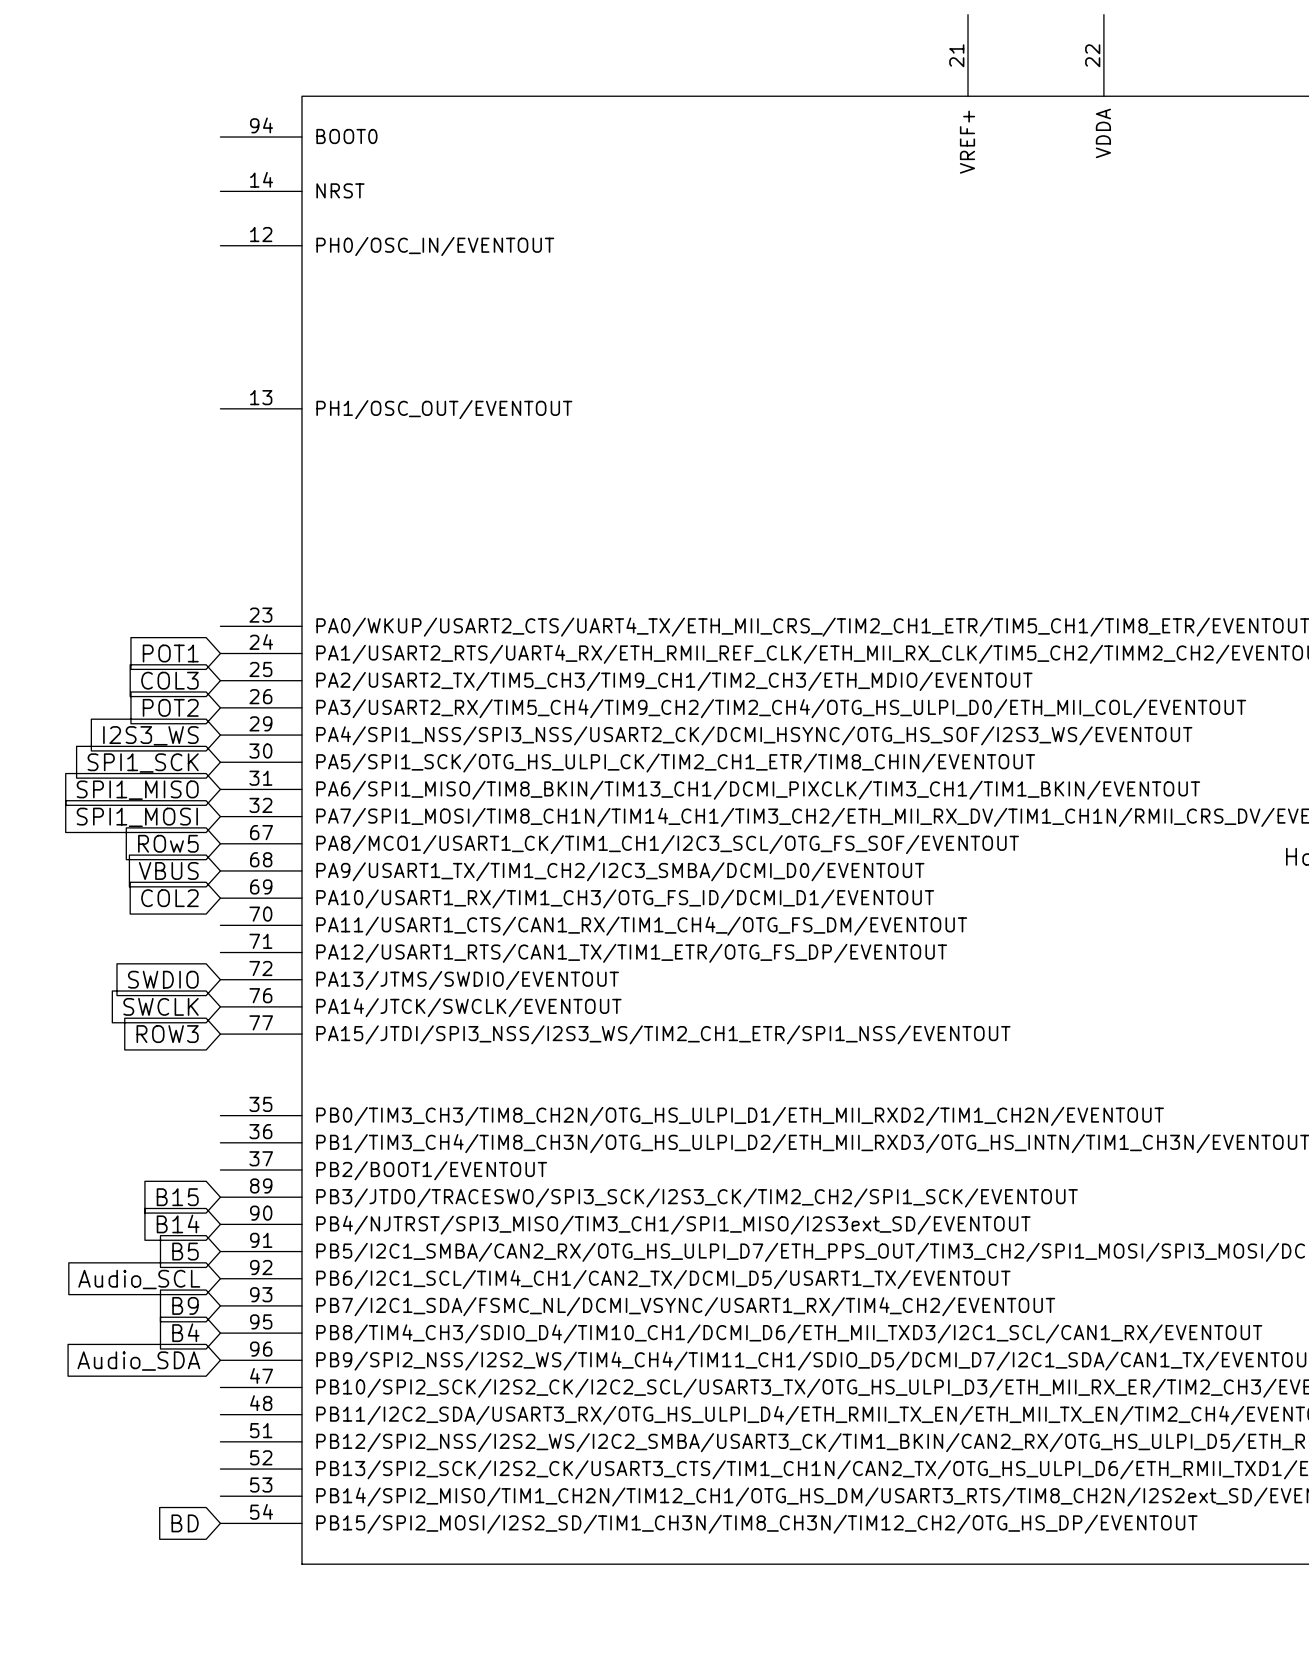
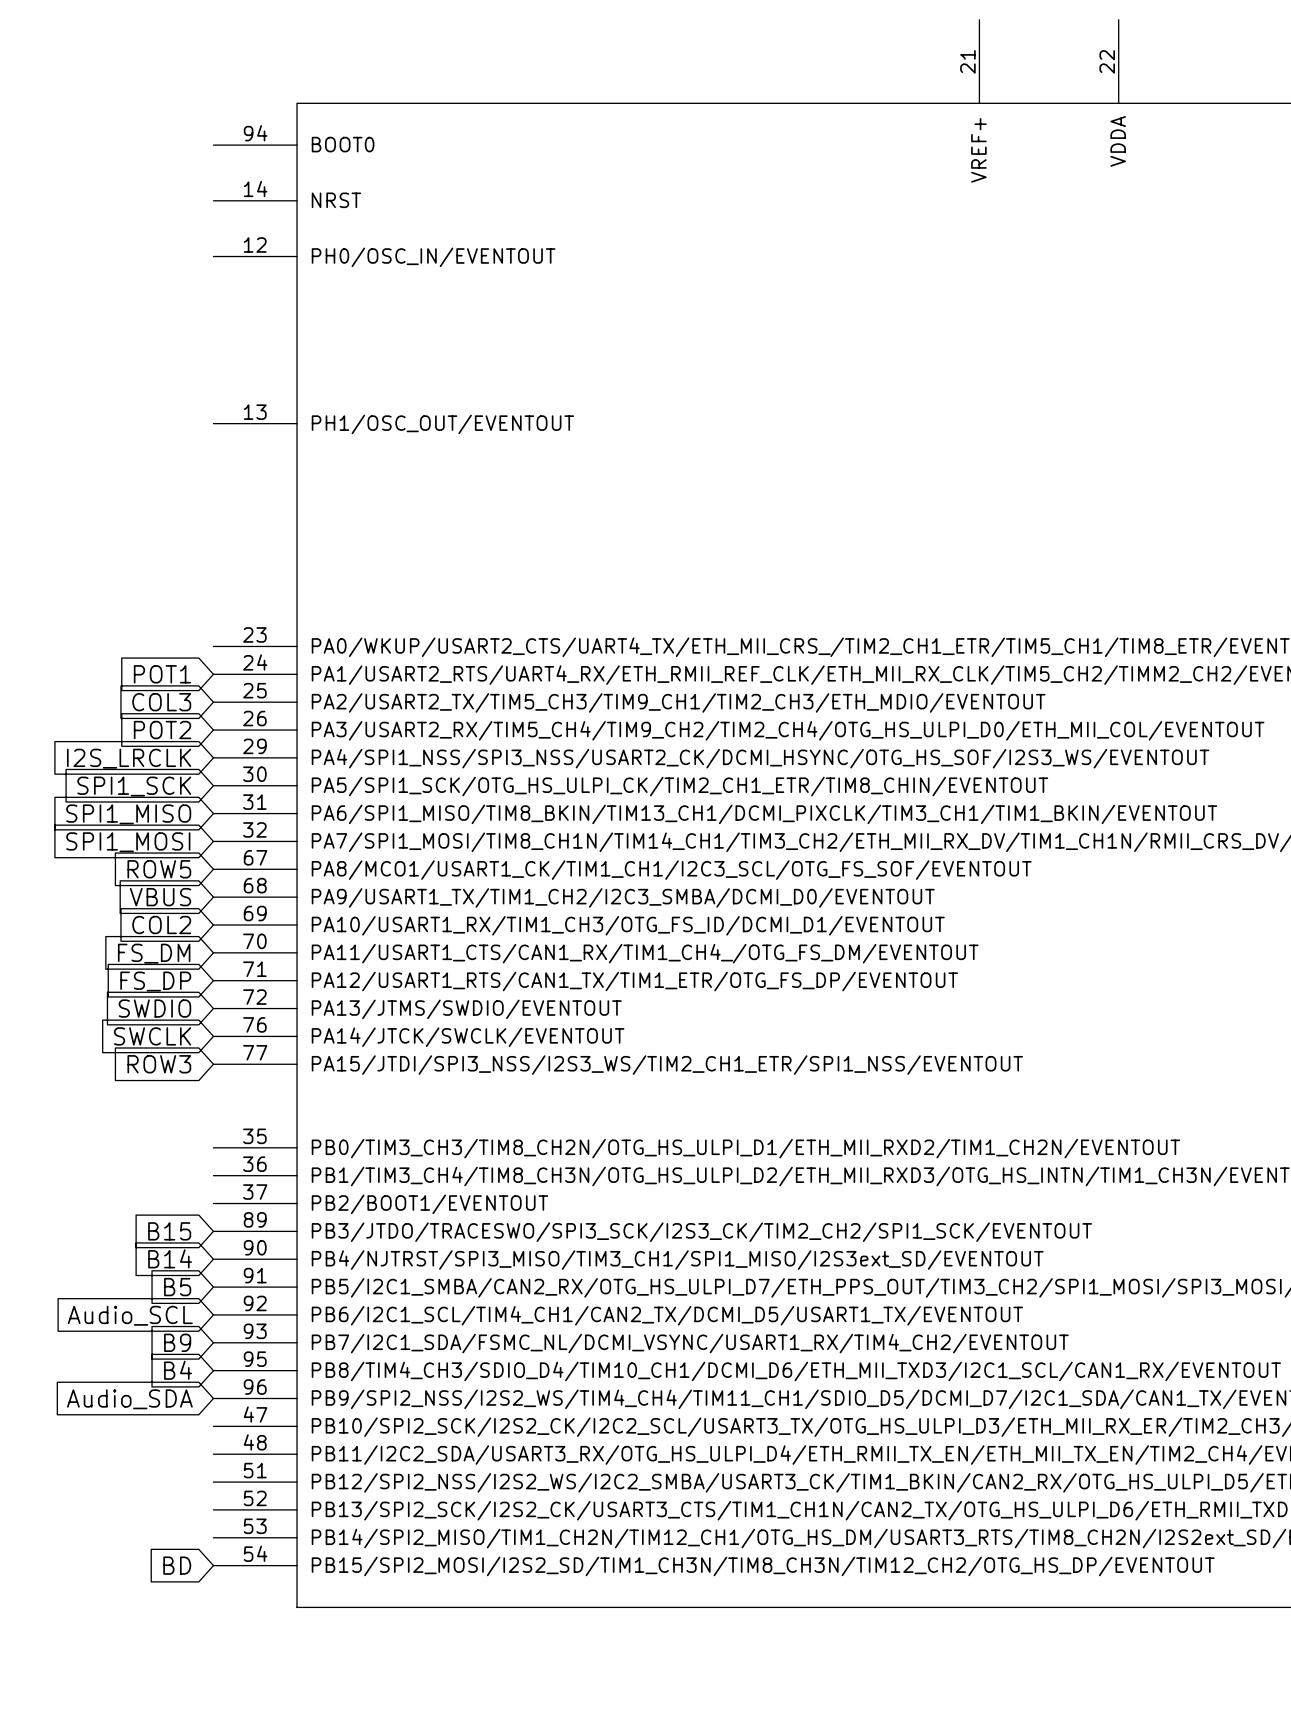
global label: I2S3_WS (150, 735) -> I2S_LRCLK (129, 758)
global label: ROw5 (168, 843) -> ROW5 (159, 869)
global label: none -> FS_DM (154, 953)
global label: none -> FS_DP (155, 981)

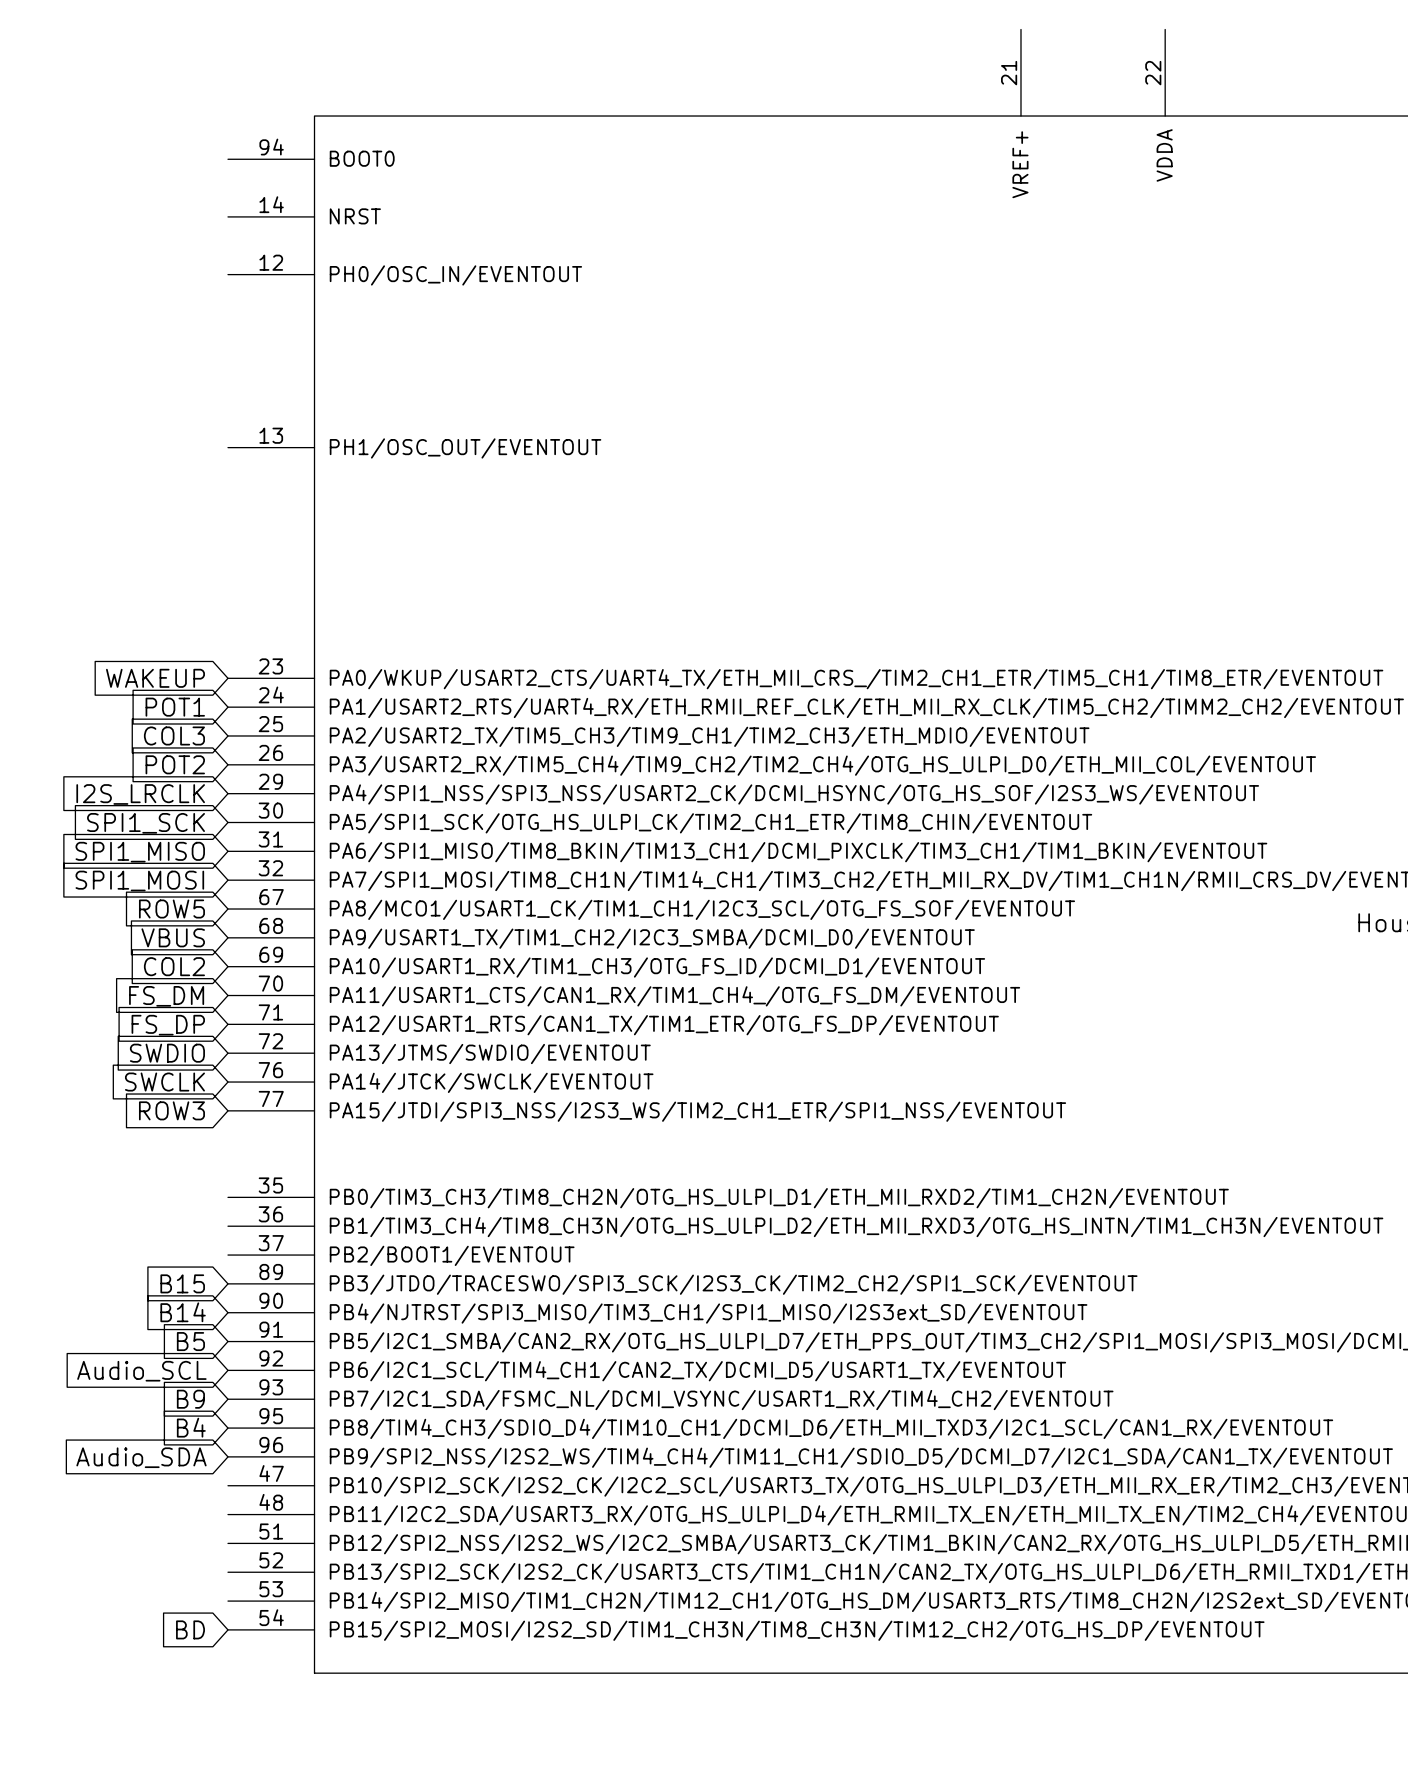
global label: none -> WAKEUP (155, 678)

